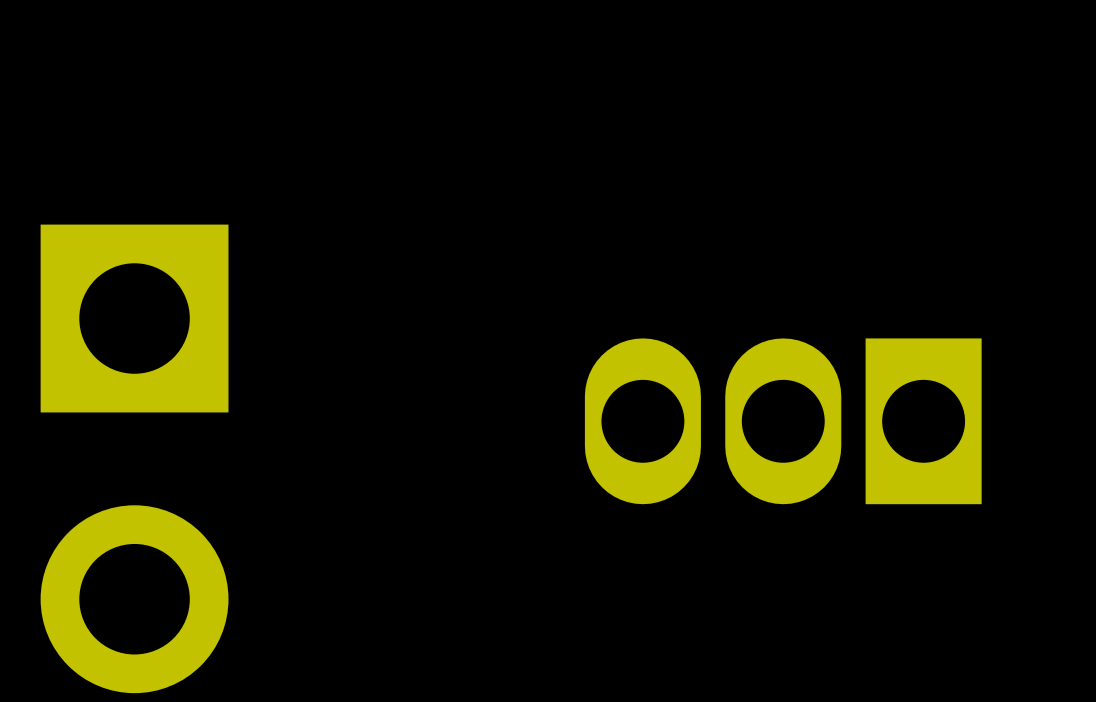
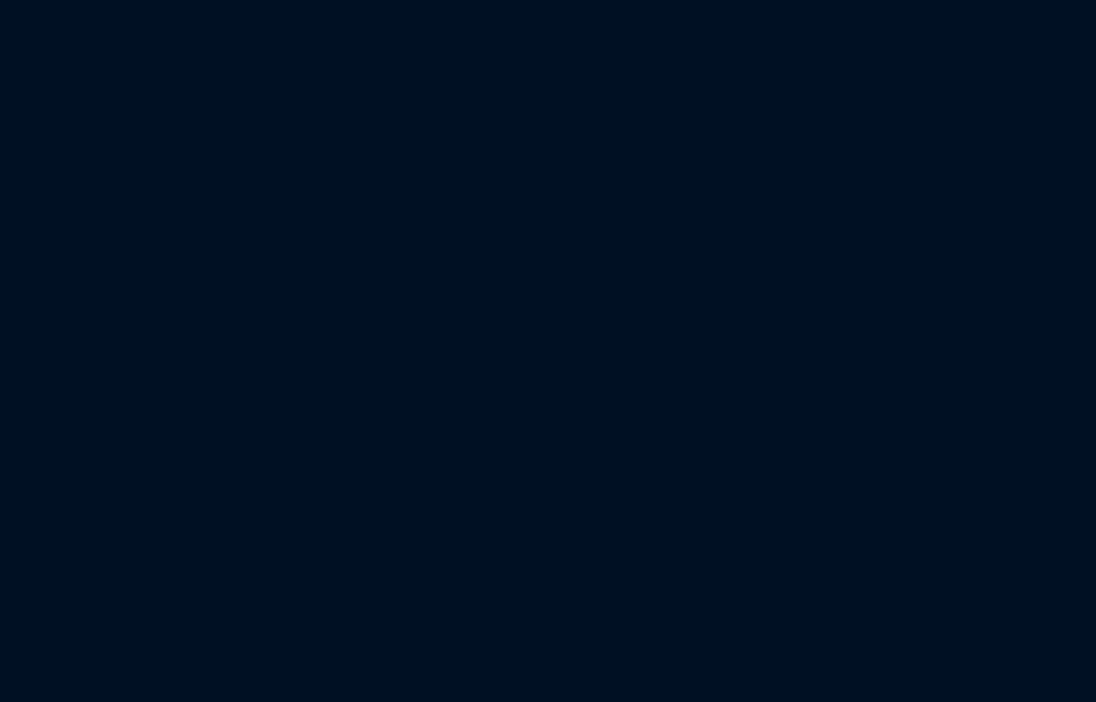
part: (783, 421) -> none
part: (134, 458) -> none

